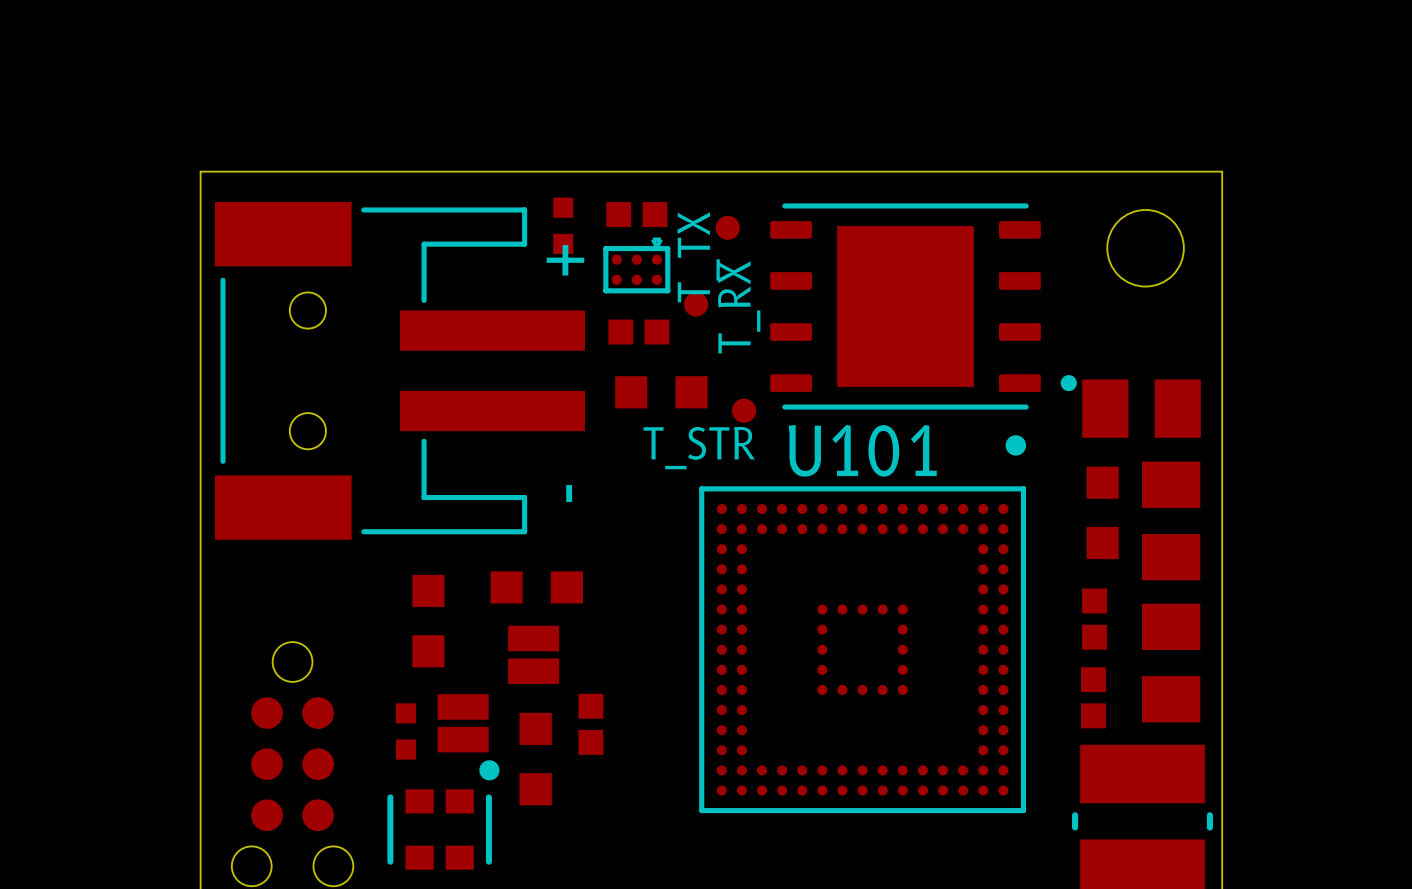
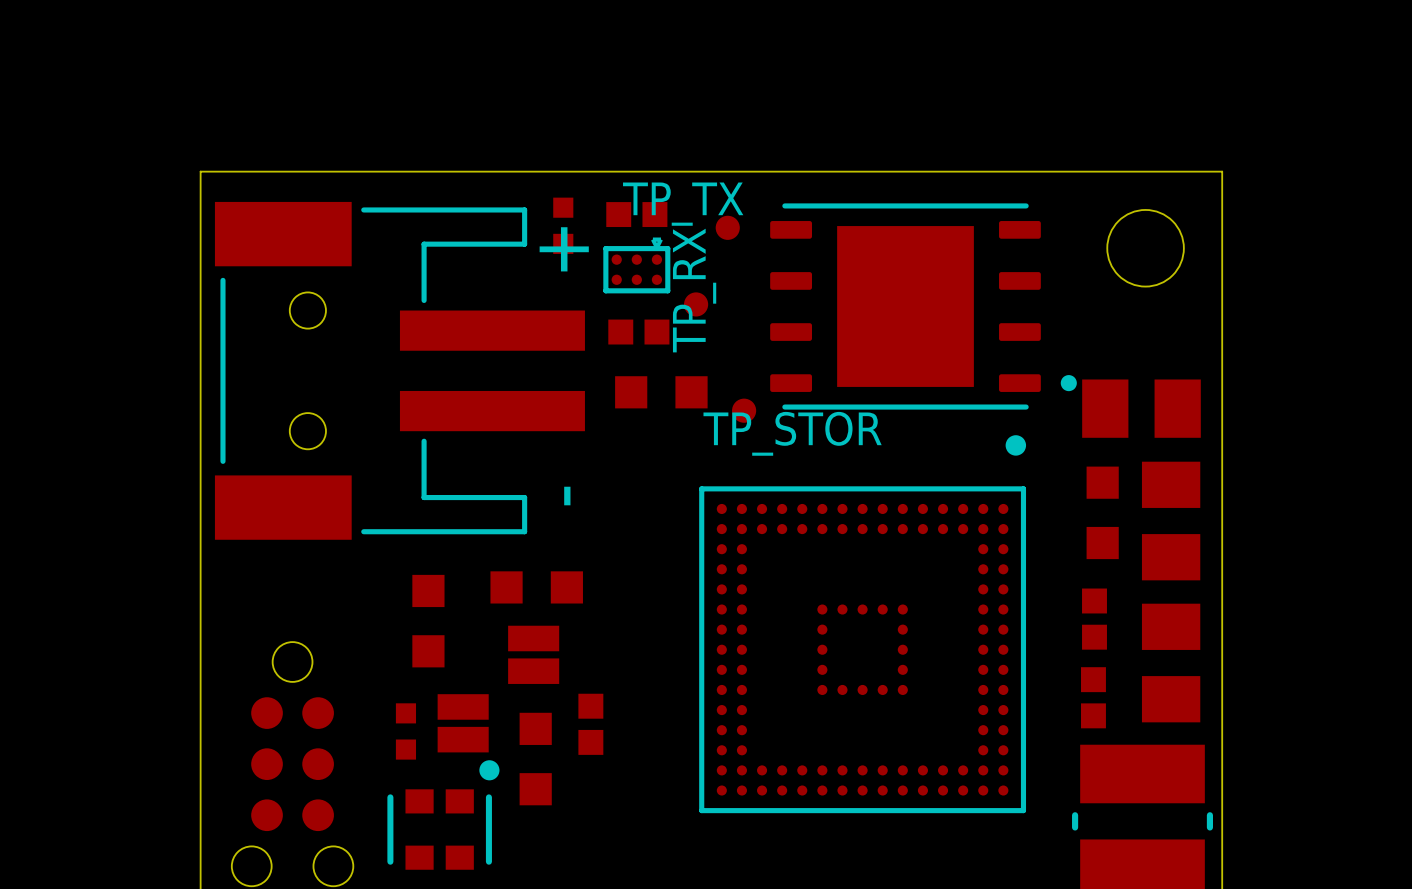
T_TX name: T_TX (698, 257) -> TP_TX (683, 204)
T_RX name: T_RX (739, 307) -> TP_RX (694, 290)
T_STR name: T_STR (699, 448) -> TP_STOR (792, 433)
U101 name: U101 (862, 450) -> none

